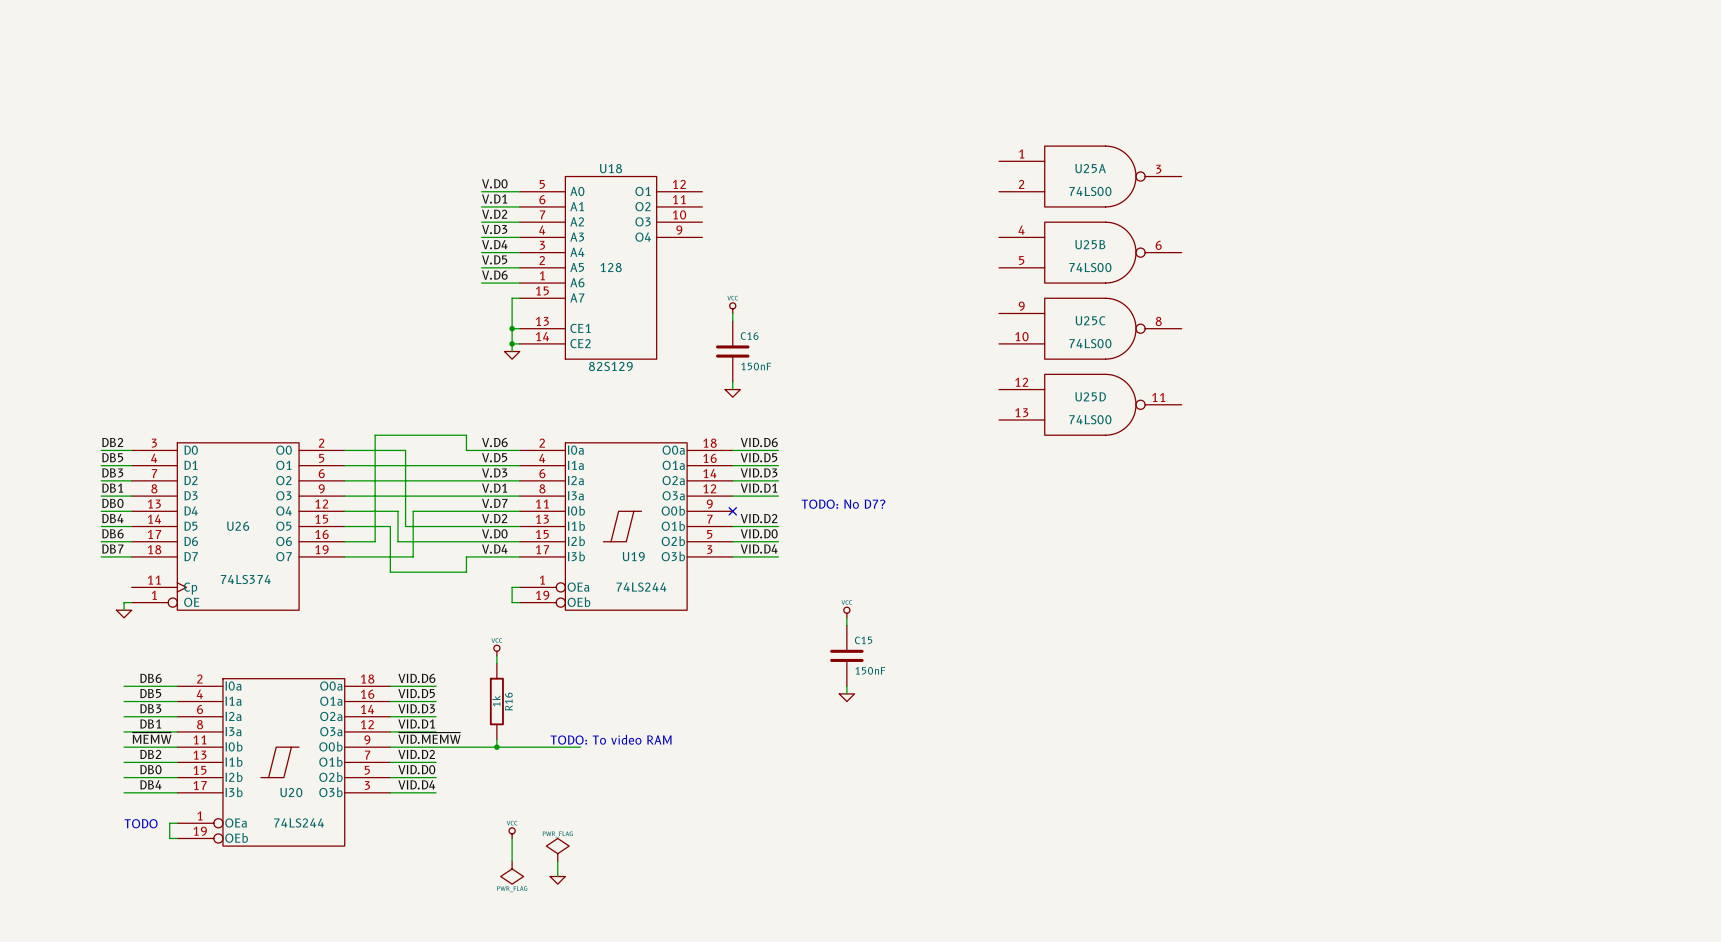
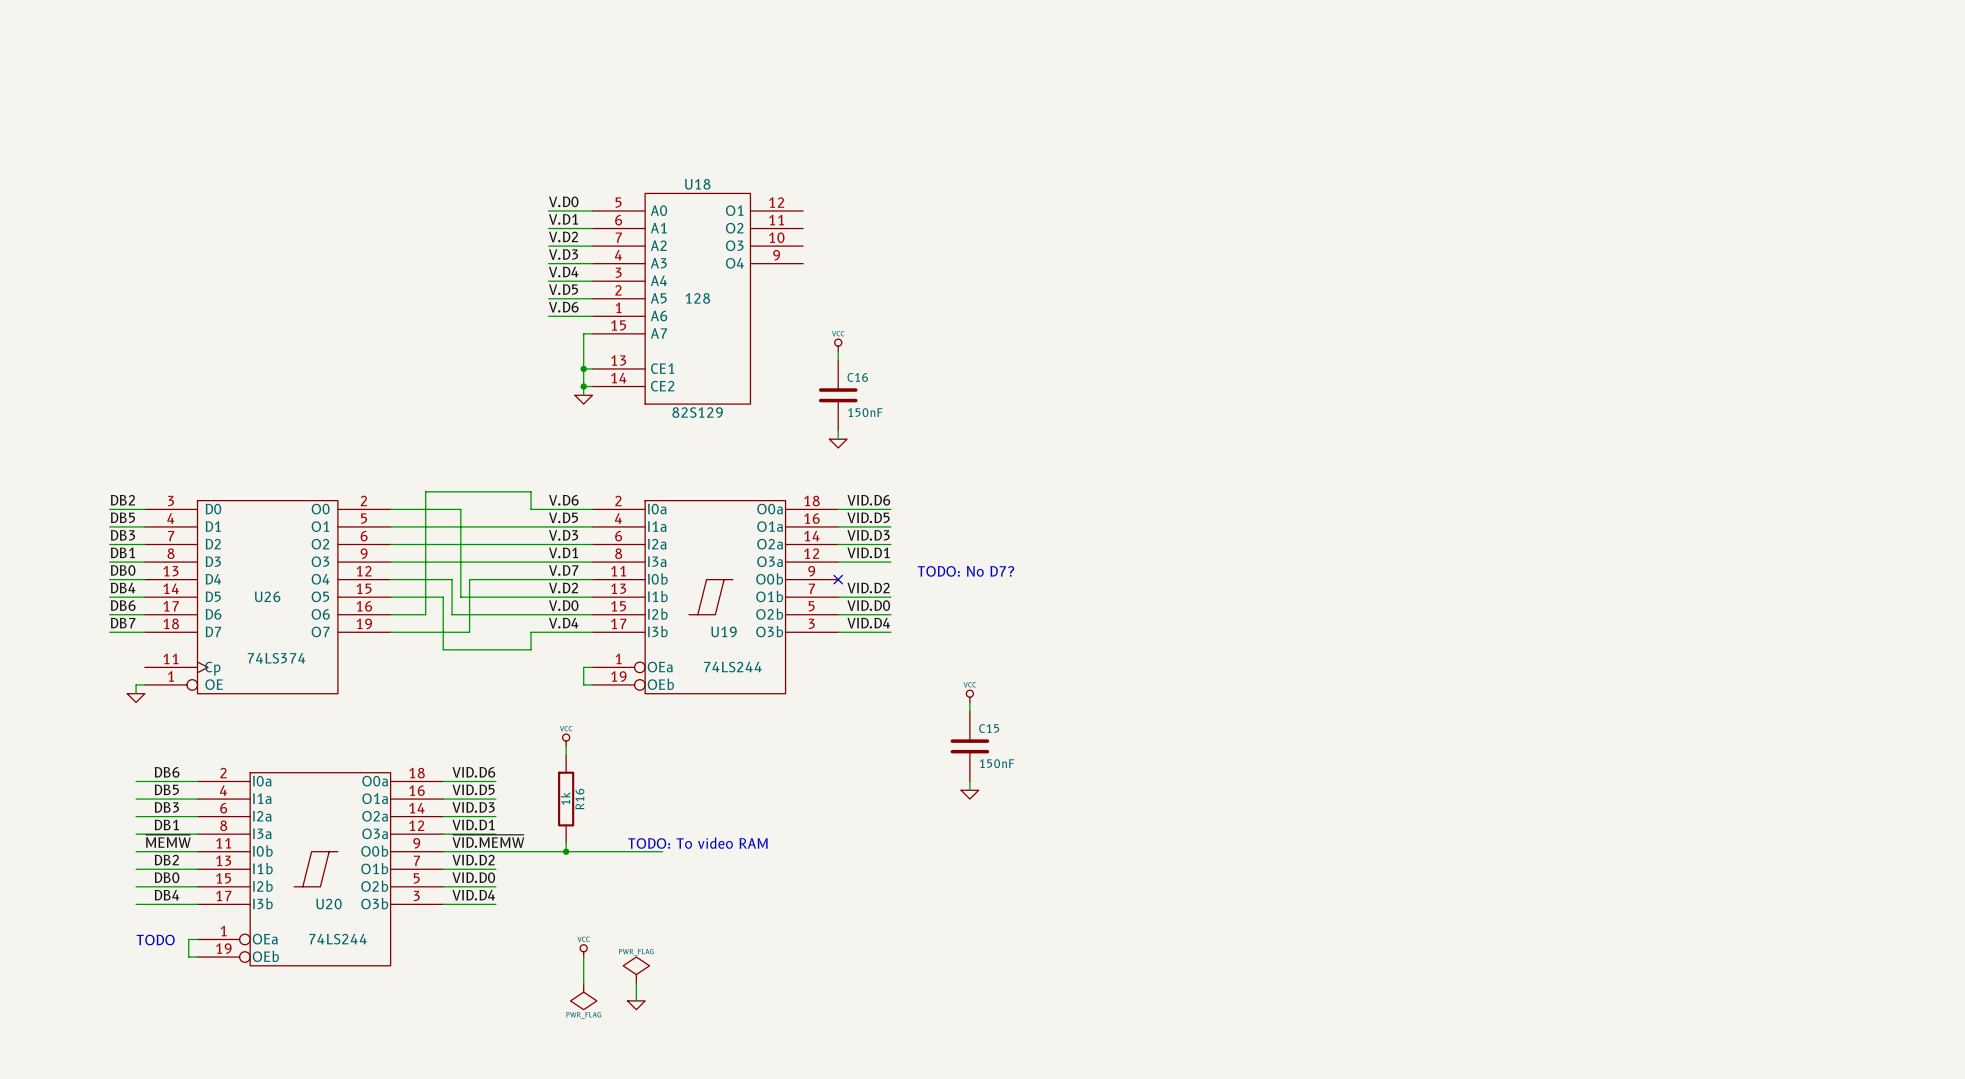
U25A: 74LS00 (1090, 176) -> none
U25B: 74LS00 (1090, 252) -> none
U25C: 74LS00 (1090, 328) -> none
U25D: 74LS00 (1090, 404) -> none

